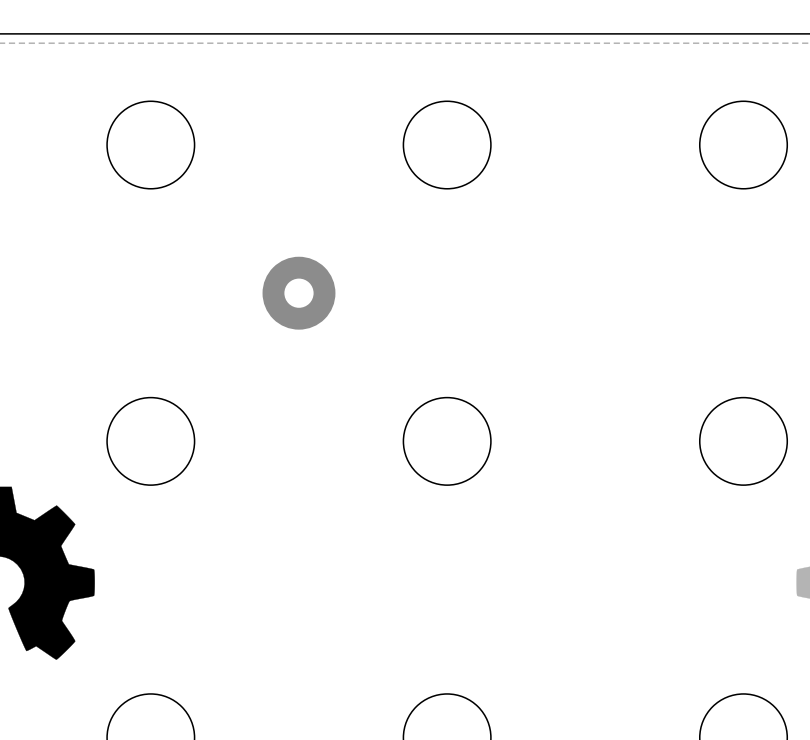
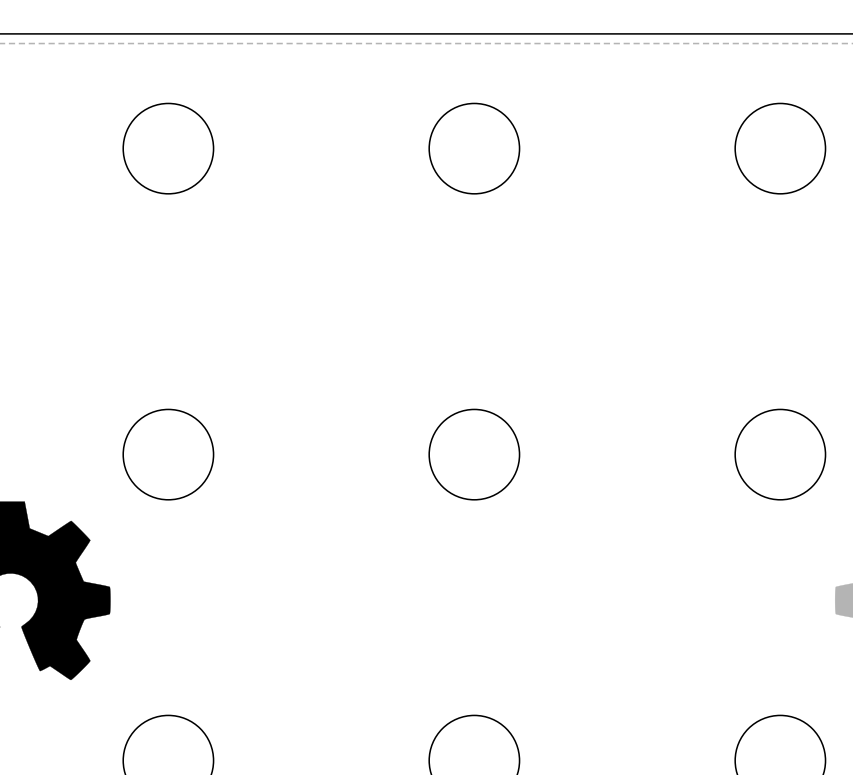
part: (298, 293) -> none

